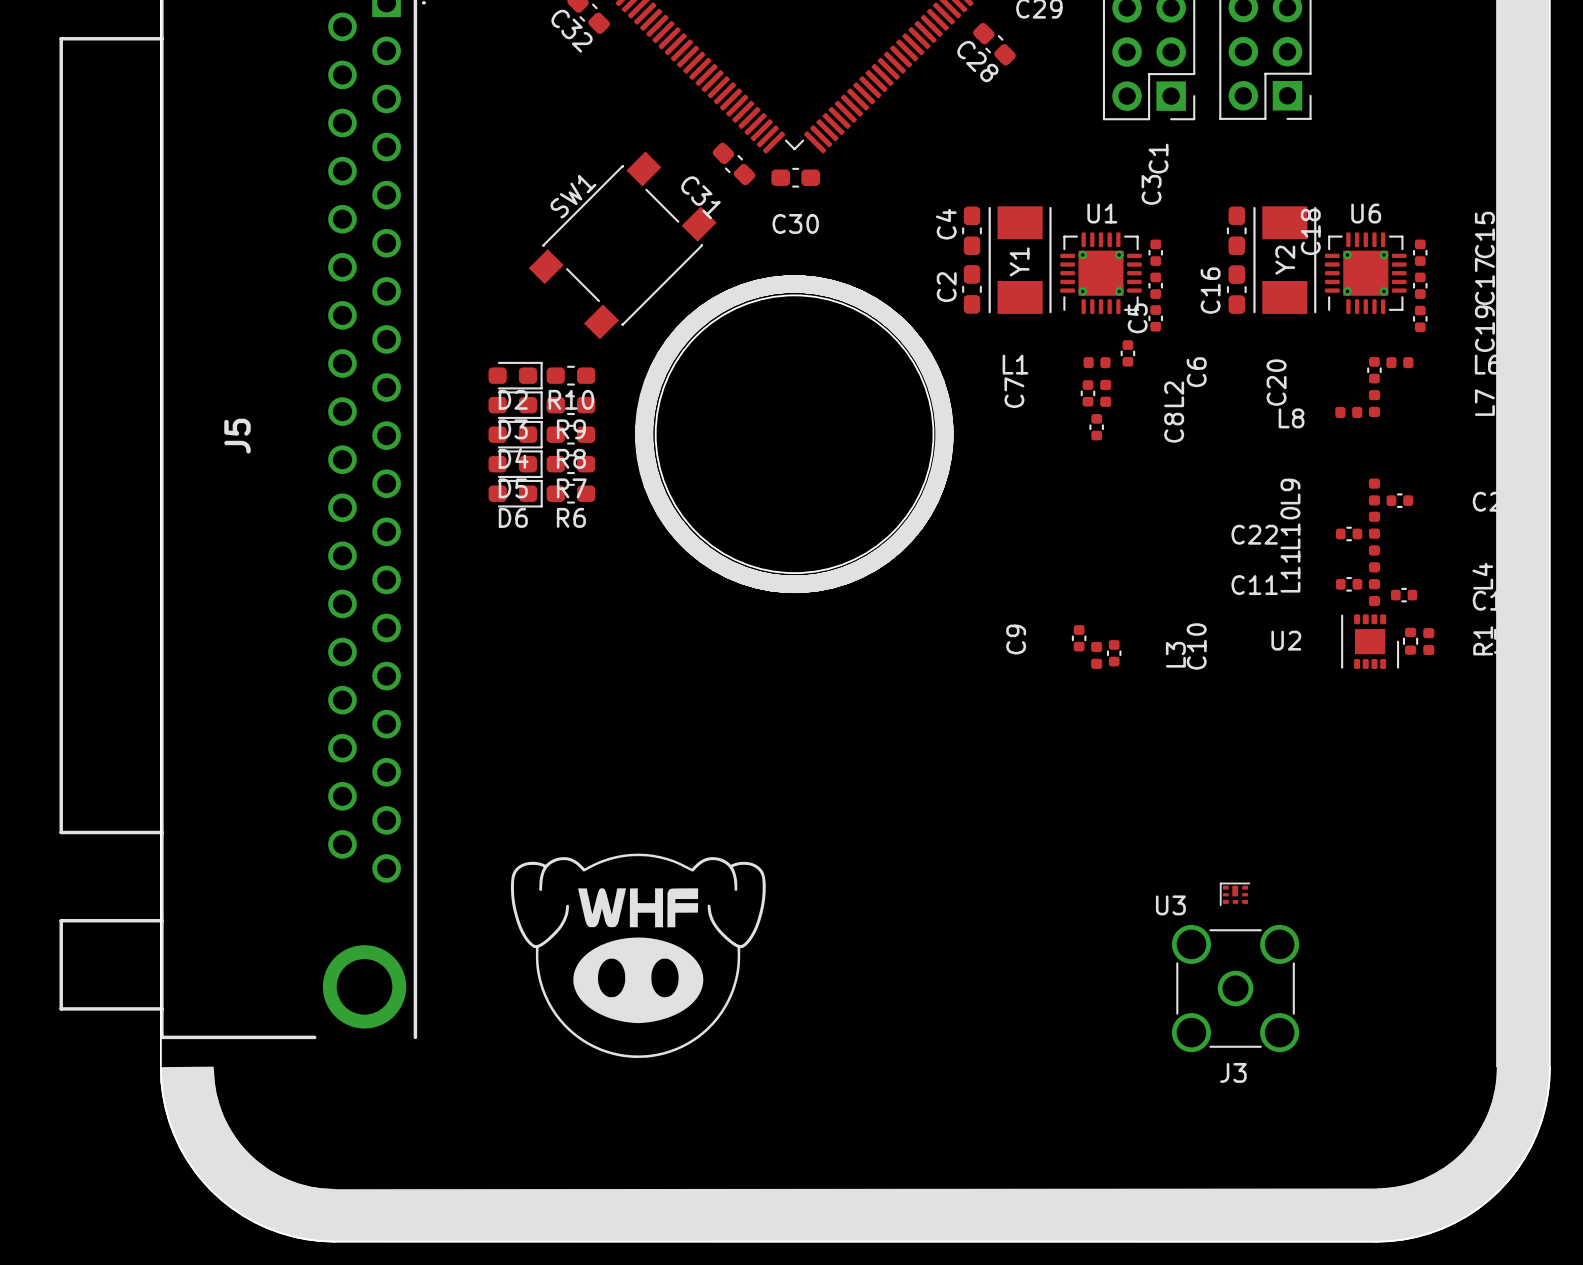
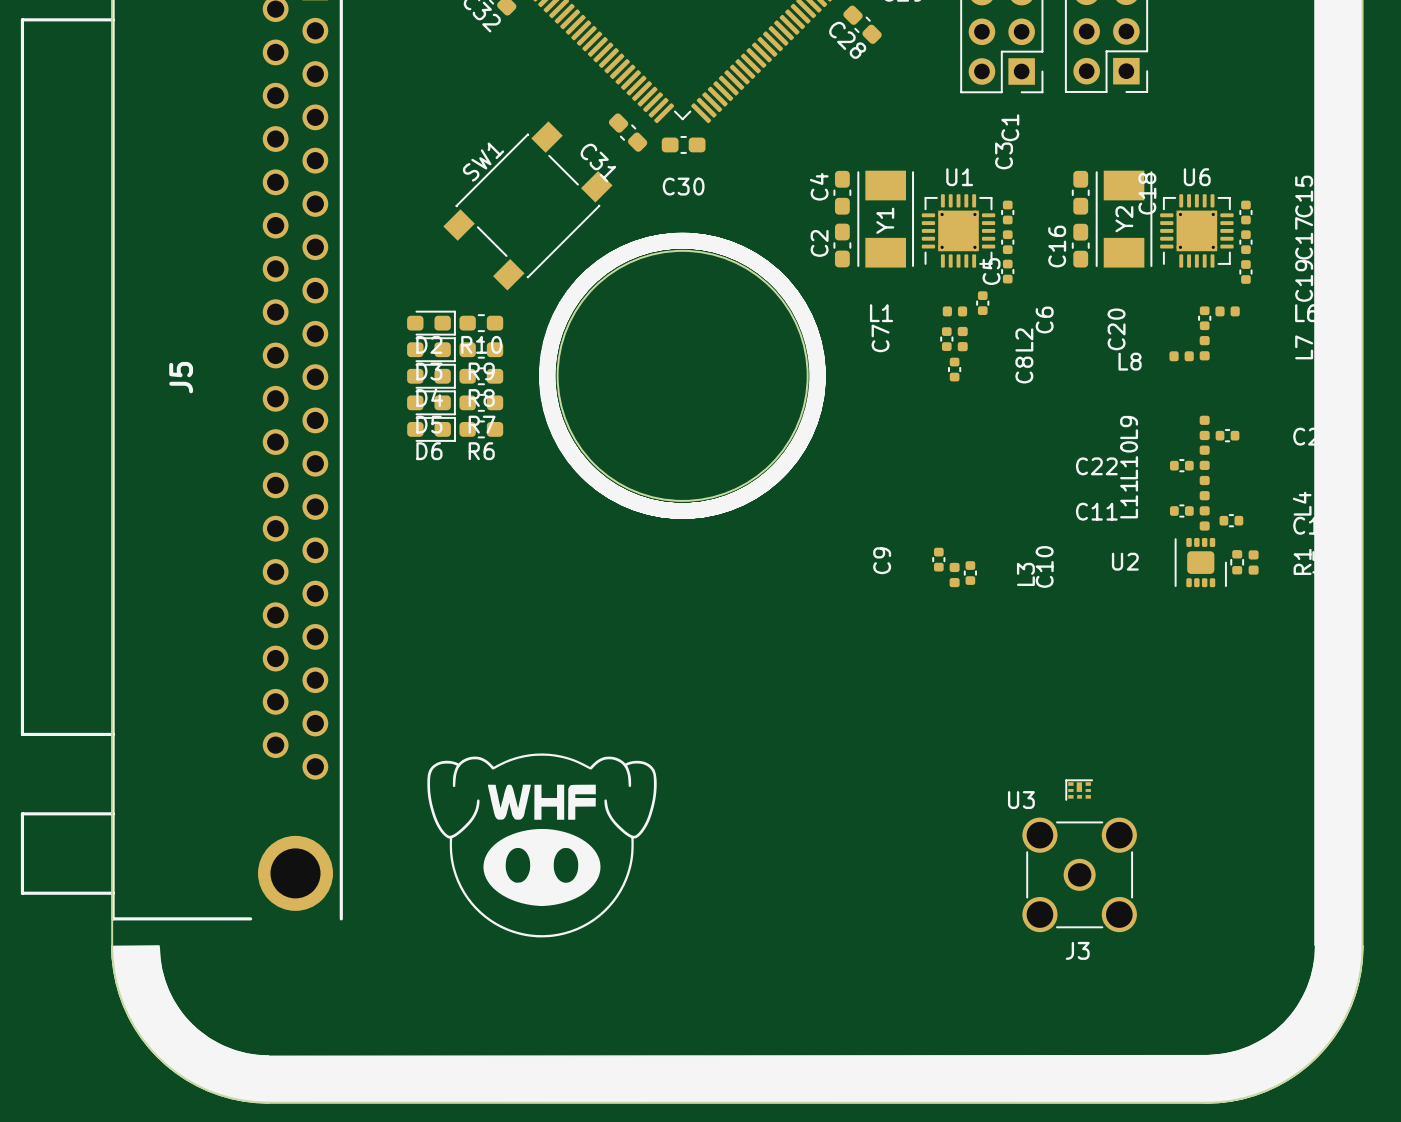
U2 footprint: [1341, 614, 1400, 669] -> [1174, 537, 1227, 588]

